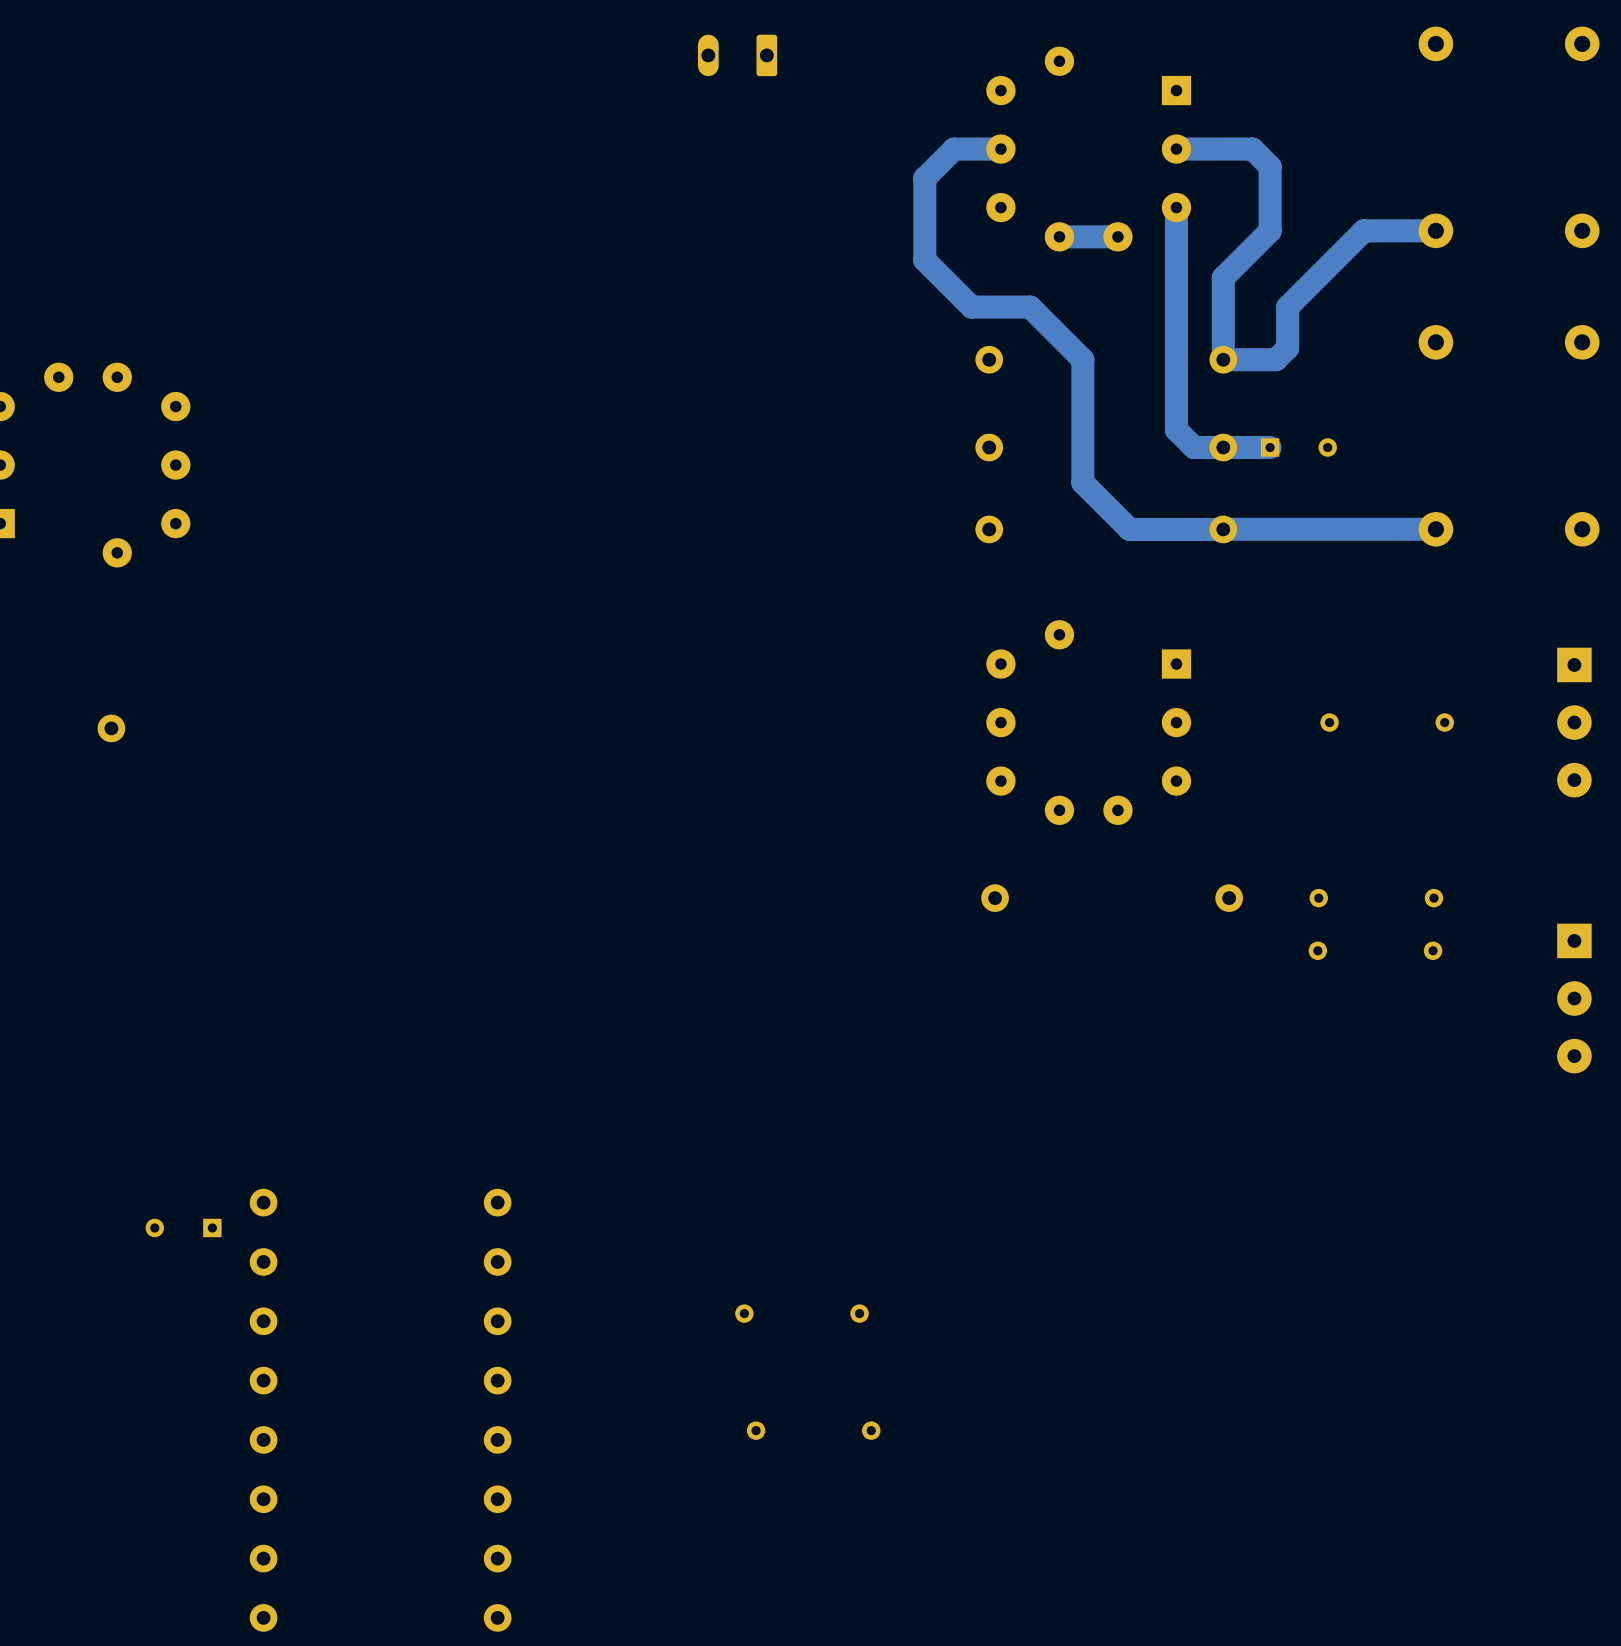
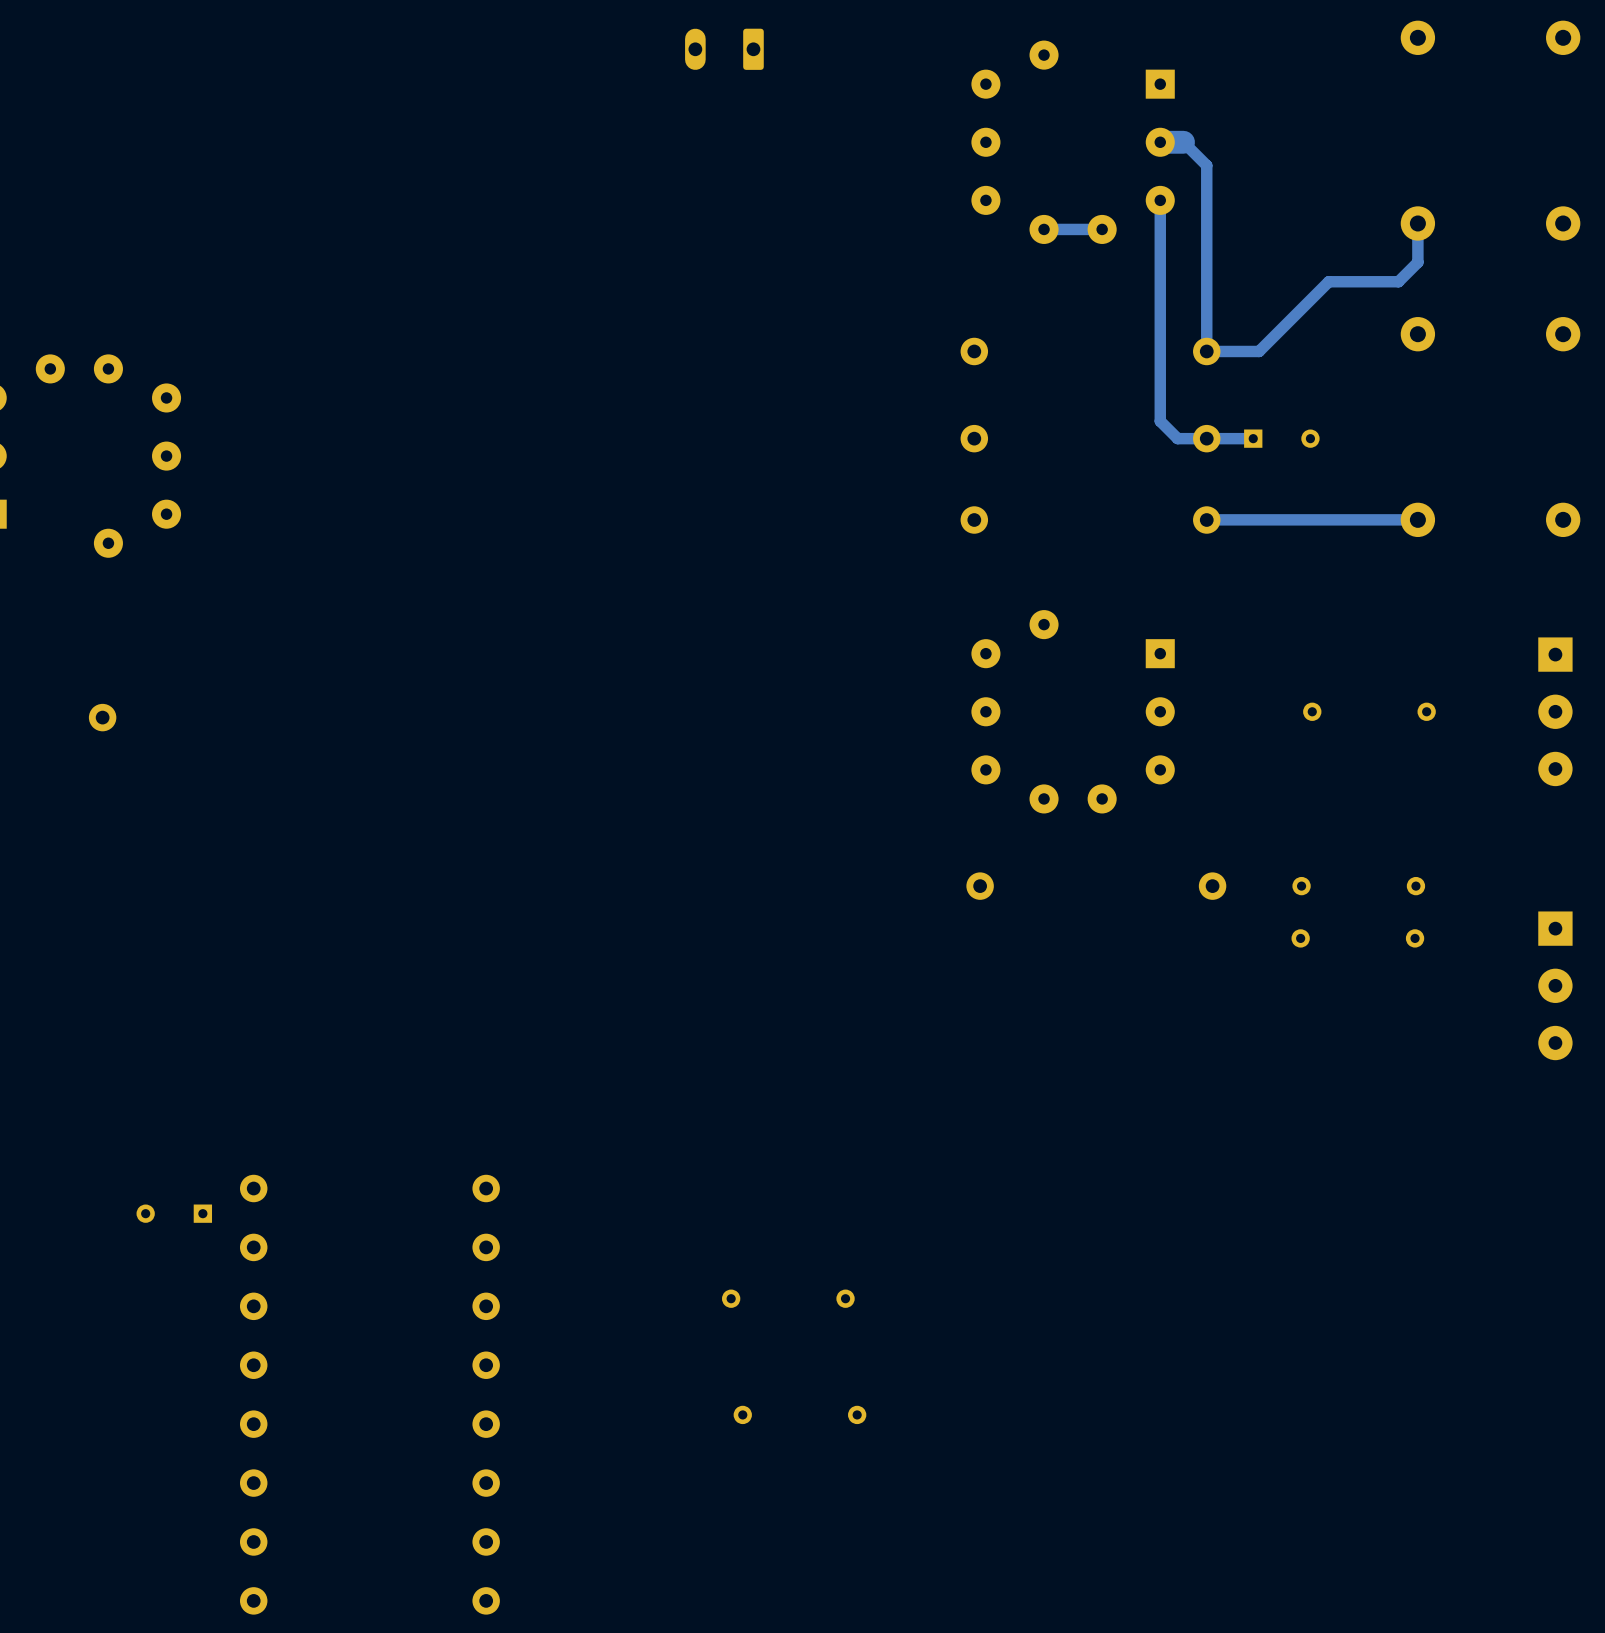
bottom track: (1000, 149) (954, 149) (924, 178) (924, 260) (971, 307) (1030, 307) (1082, 359) (1082, 482) (1129, 529) (1223, 529) -> none
bottom track: (1199, 149) (1252, 149) (1270, 166) (1270, 230) (1223, 277) -> (1183, 142) (1206, 165) (1206, 270)
bottom track width: thick (1176, 207) (1176, 429) (1194, 447) (1270, 447) -> thin (1160, 200) (1160, 421) (1177, 438) (1253, 438)
bottom track: (1435, 230) (1363, 230) (1287, 307) (1287, 348) -> (1417, 223) (1417, 262) (1398, 281) (1328, 281) (1270, 339)
bottom track width: thick (1117, 236) (1059, 236) -> thin (1102, 229) (1044, 229)
bottom track width: thick (1223, 277) (1223, 359) (1275, 359) (1287, 348) -> thin (1206, 270) (1206, 351) (1259, 351) (1270, 339)
bottom track width: thick (1435, 529) (1223, 529) -> thin (1417, 519) (1206, 519)

